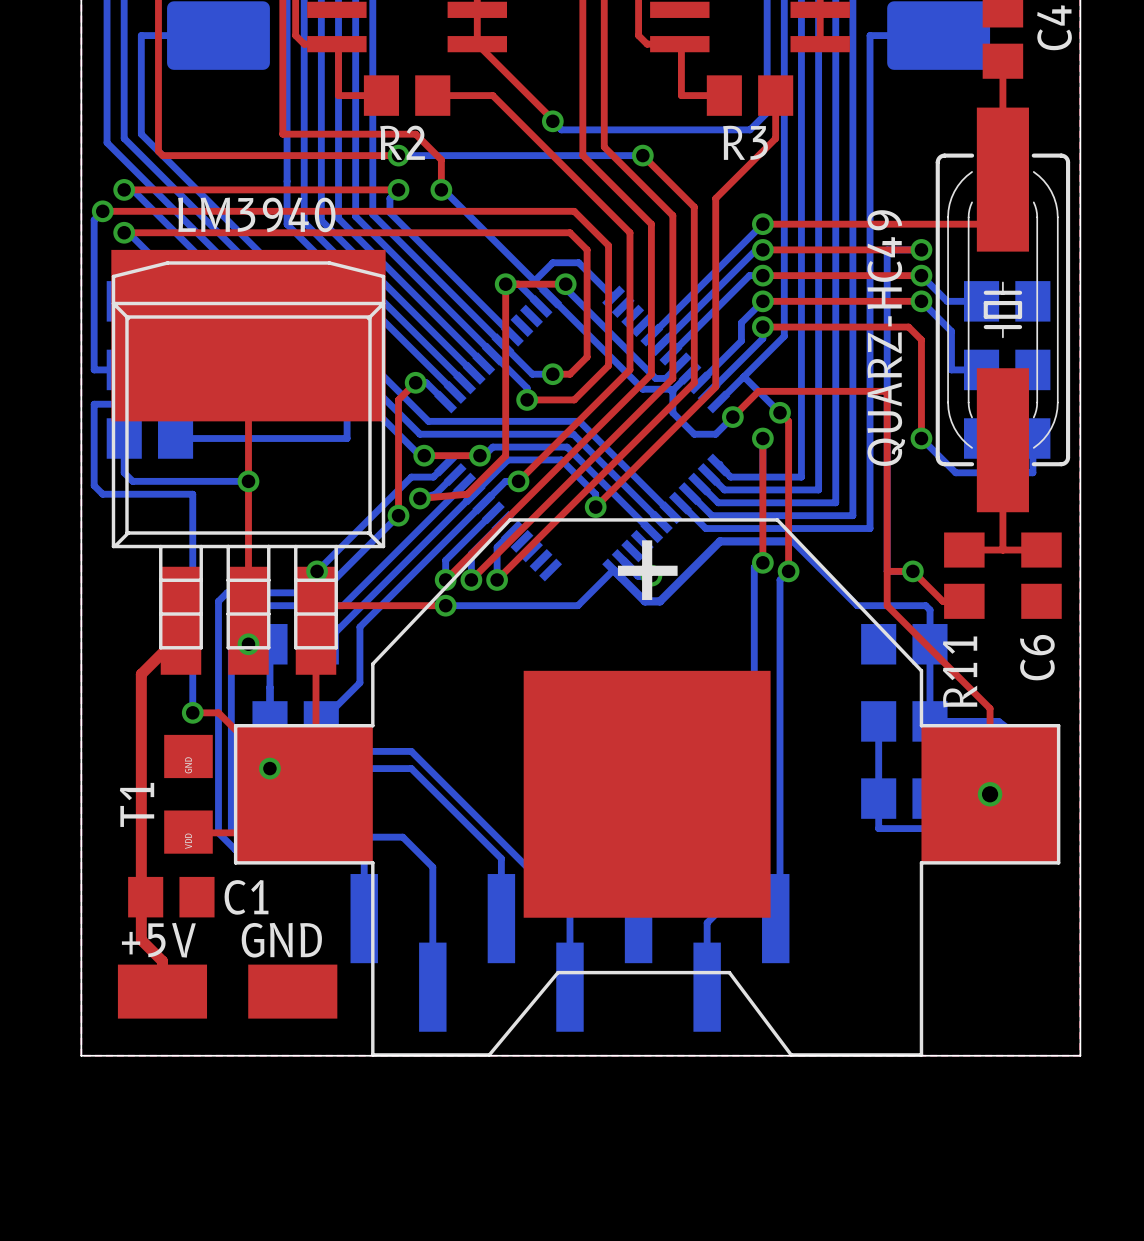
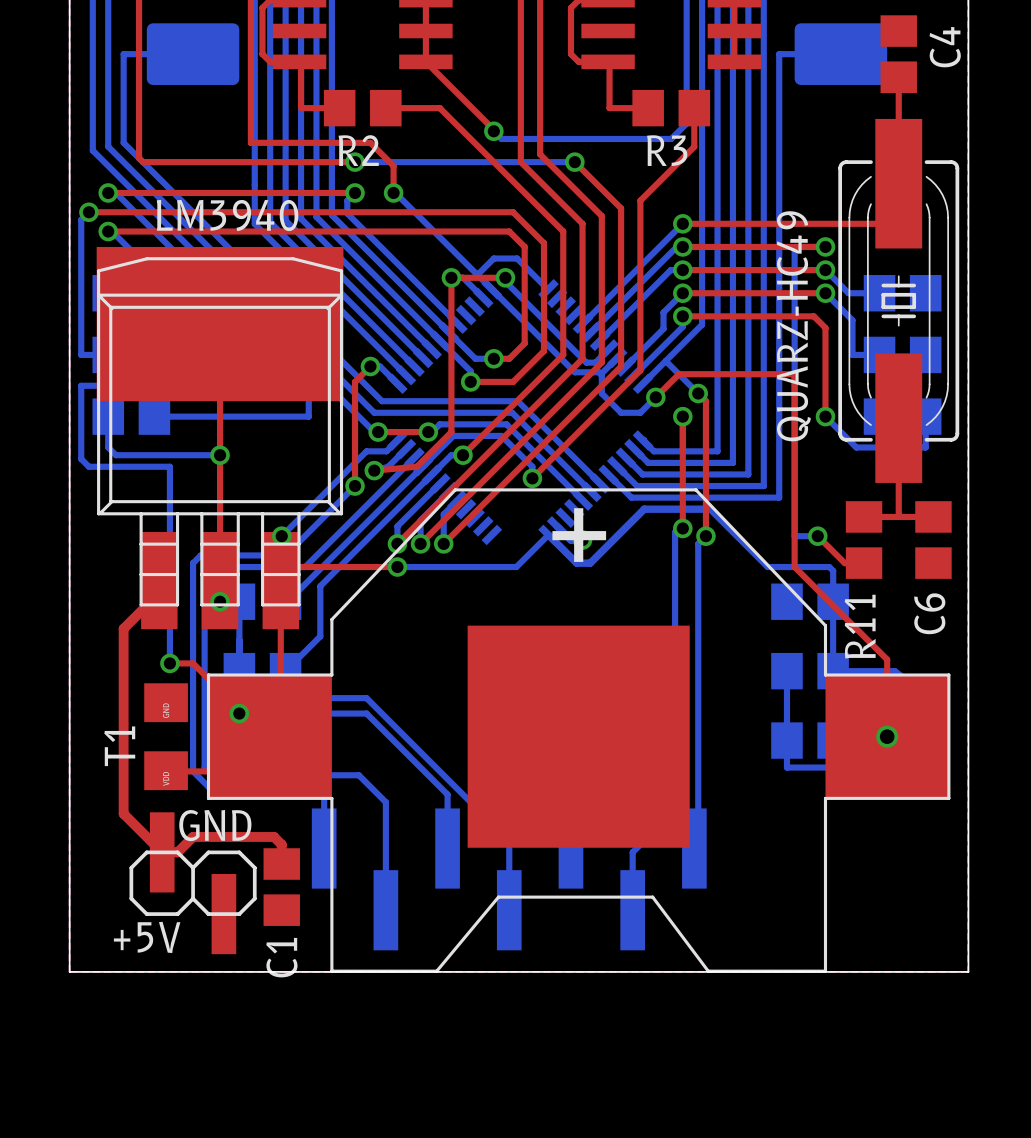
top track: (887, 571) (912, 571) -> none
top track: (141, 880) (141, 940) (162, 961) (162, 991) -> (123, 813) (162, 852)
C1 rotation: 0° (171, 897) -> 90° clockwise (281, 887)
C1 position: (171, 897) -> (281, 887)
top track: none -> (162, 852) (177, 852) (193, 836) (274, 836) (281, 844) (281, 864)
text position: +5V (158, 940) -> +5V (147, 937)
text position: GND (281, 940) -> GND (215, 825)
part: none -> (193, 883)
part: (227, 991) -> none

